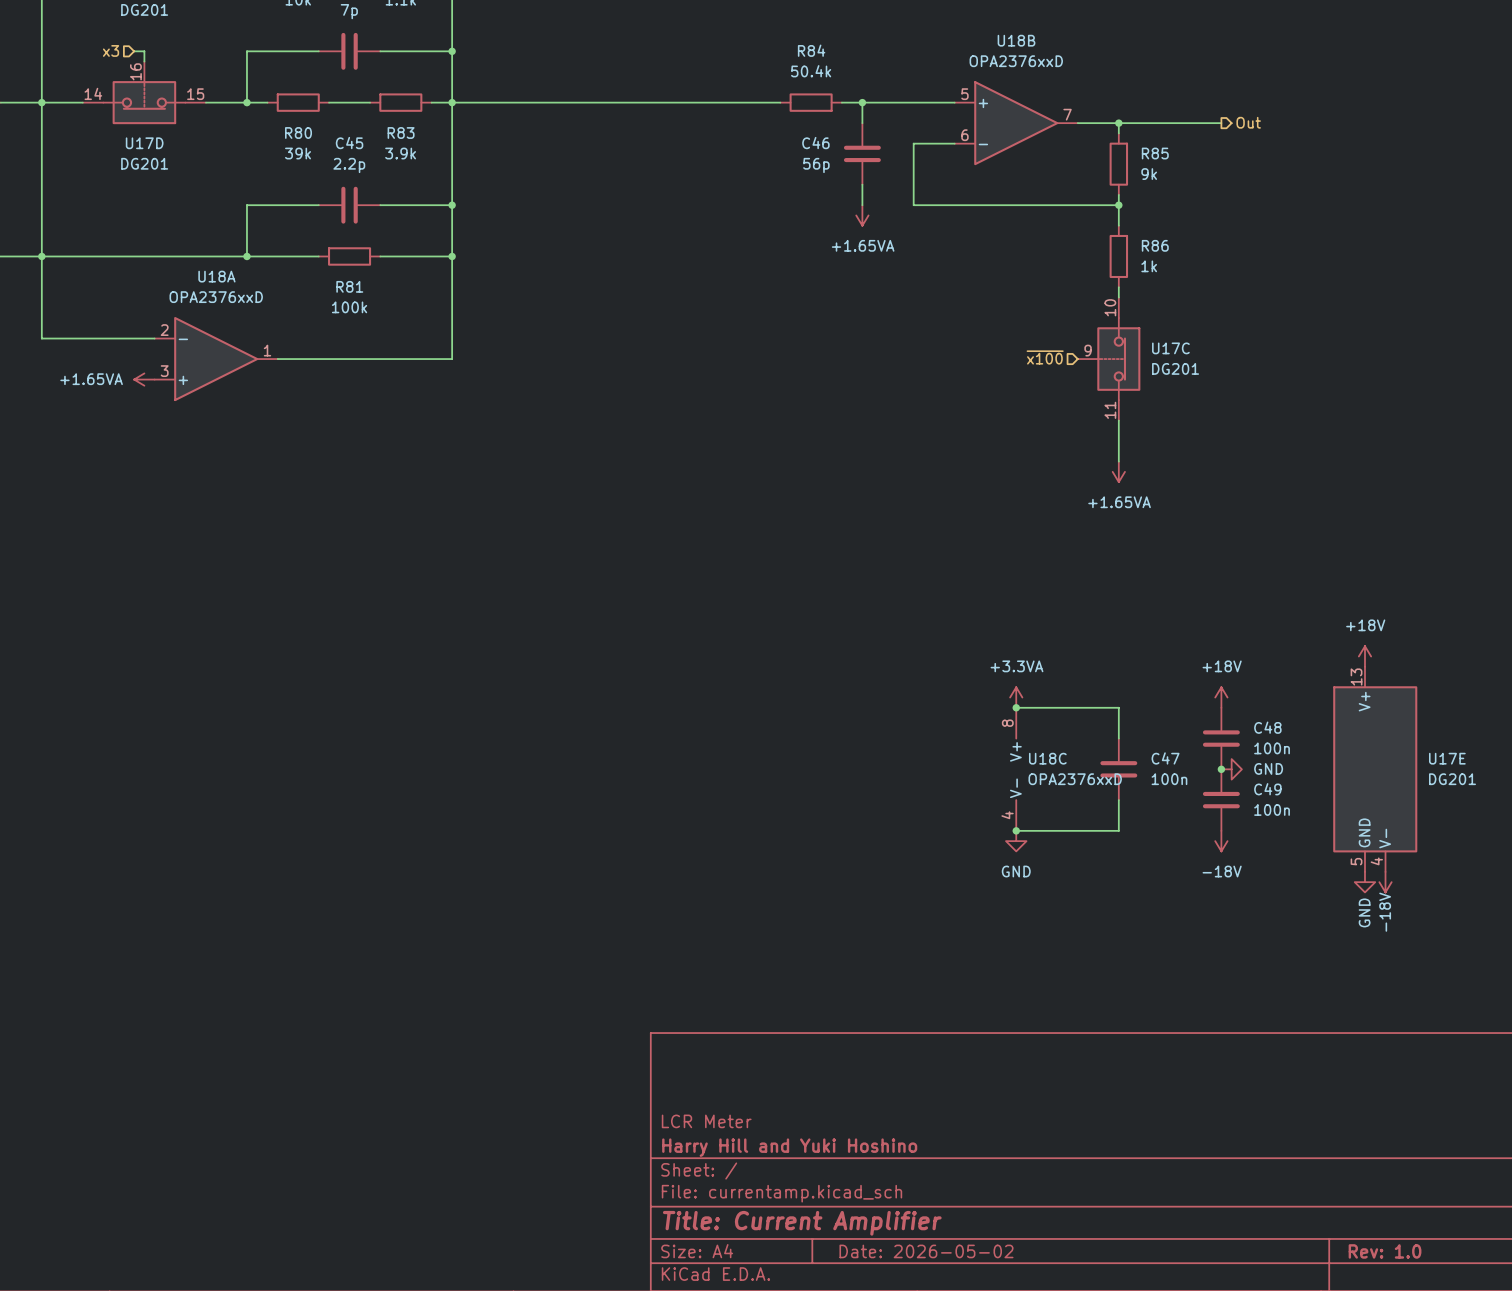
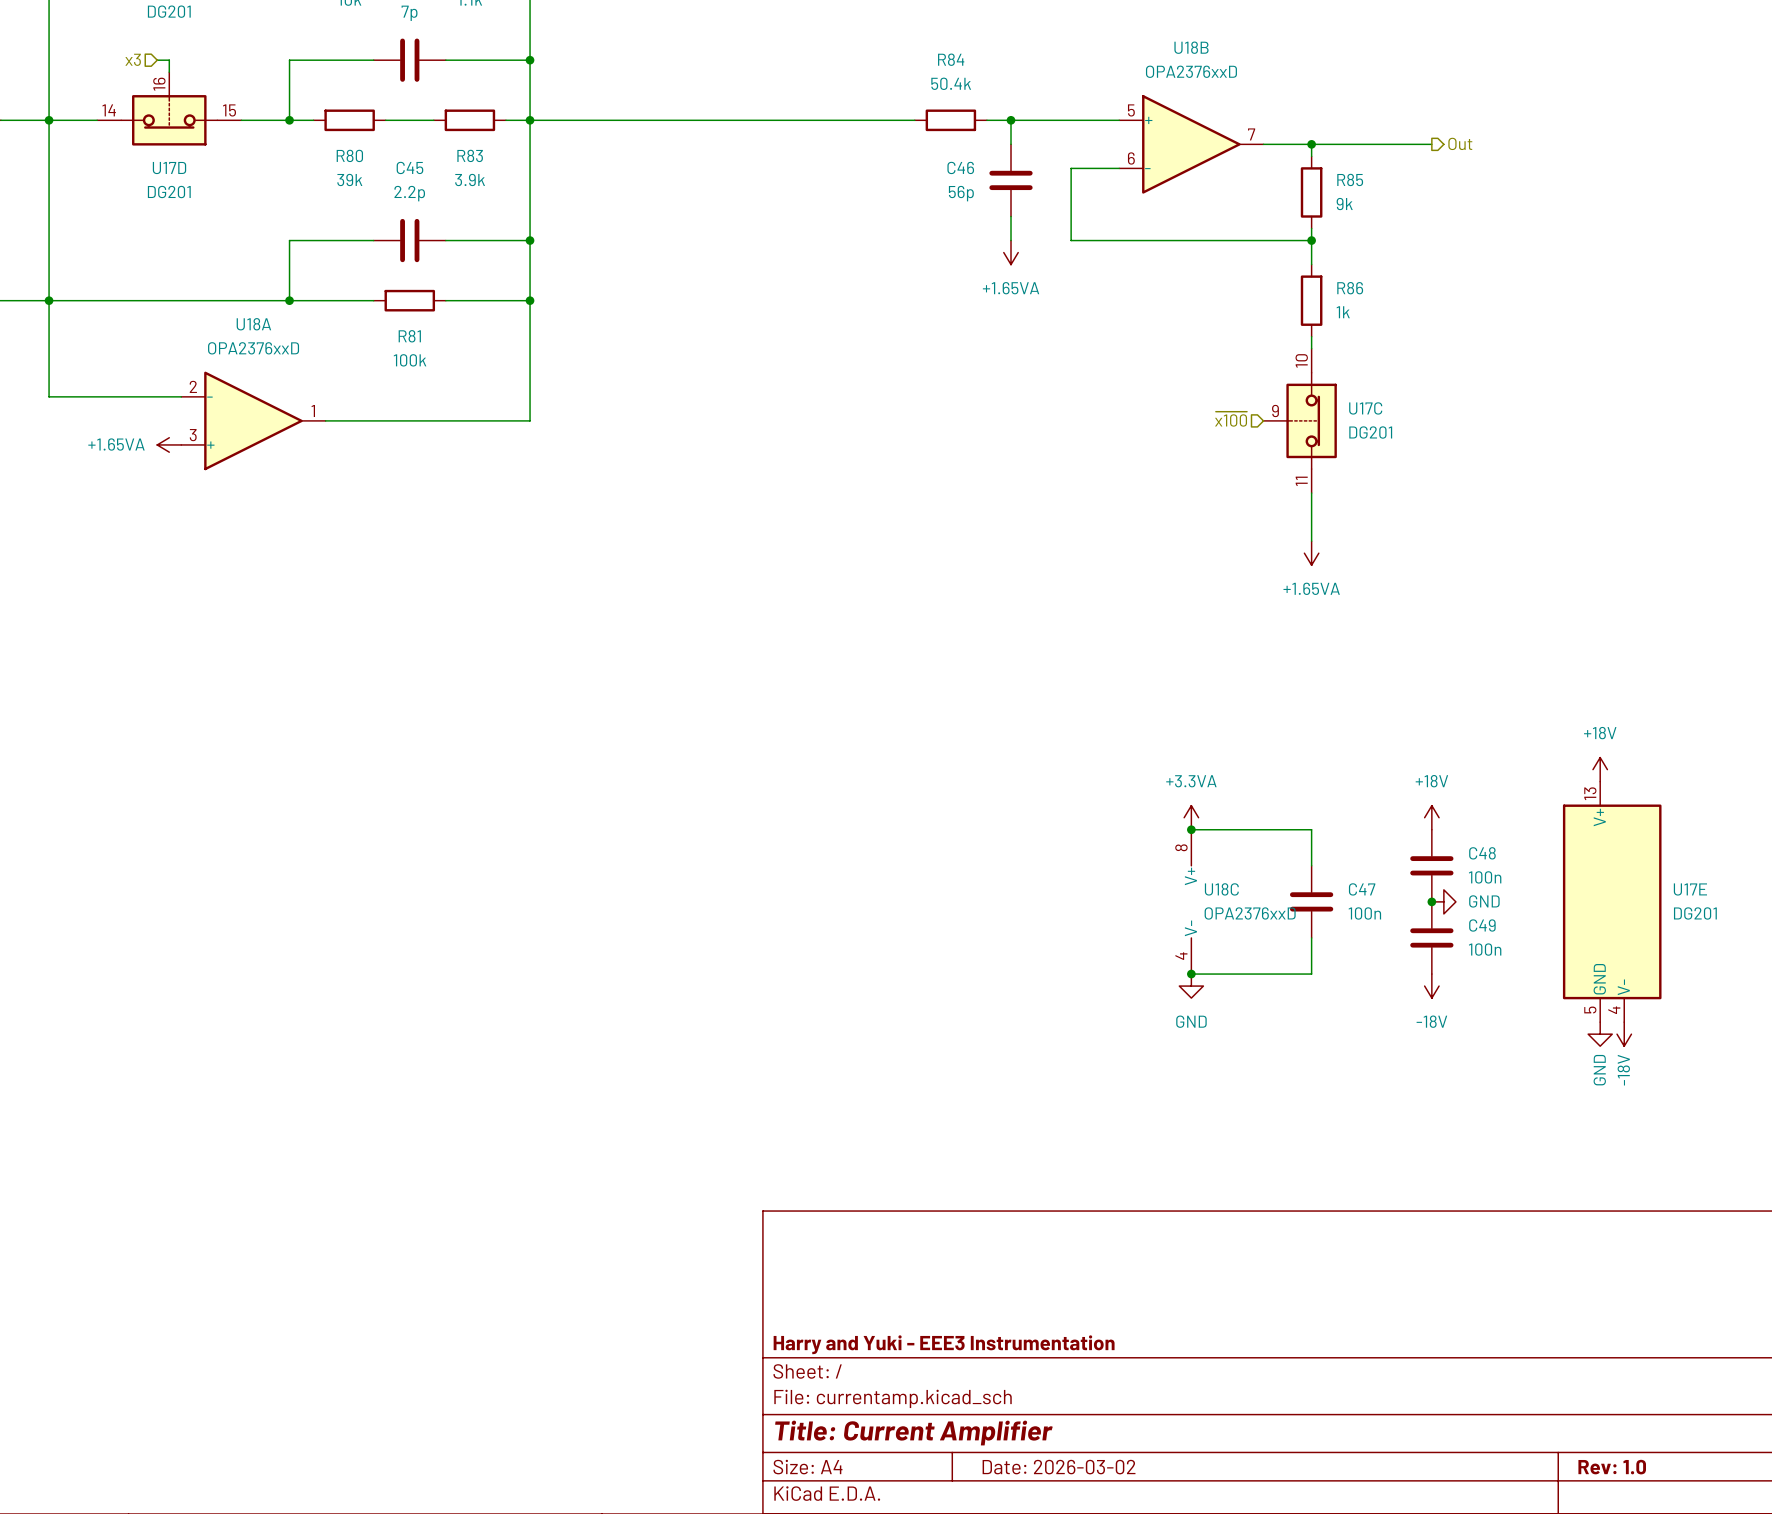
title block: LCR Meter (706, 1121) -> none
title block: Harry Hill and Yuki Hoshino (789, 1147) -> Harry and Yuki - EEE3 Instrumentation (944, 1344)
title block: Date: 2026-05-02 (926, 1251) -> Date: 2026-03-02 (1059, 1467)

